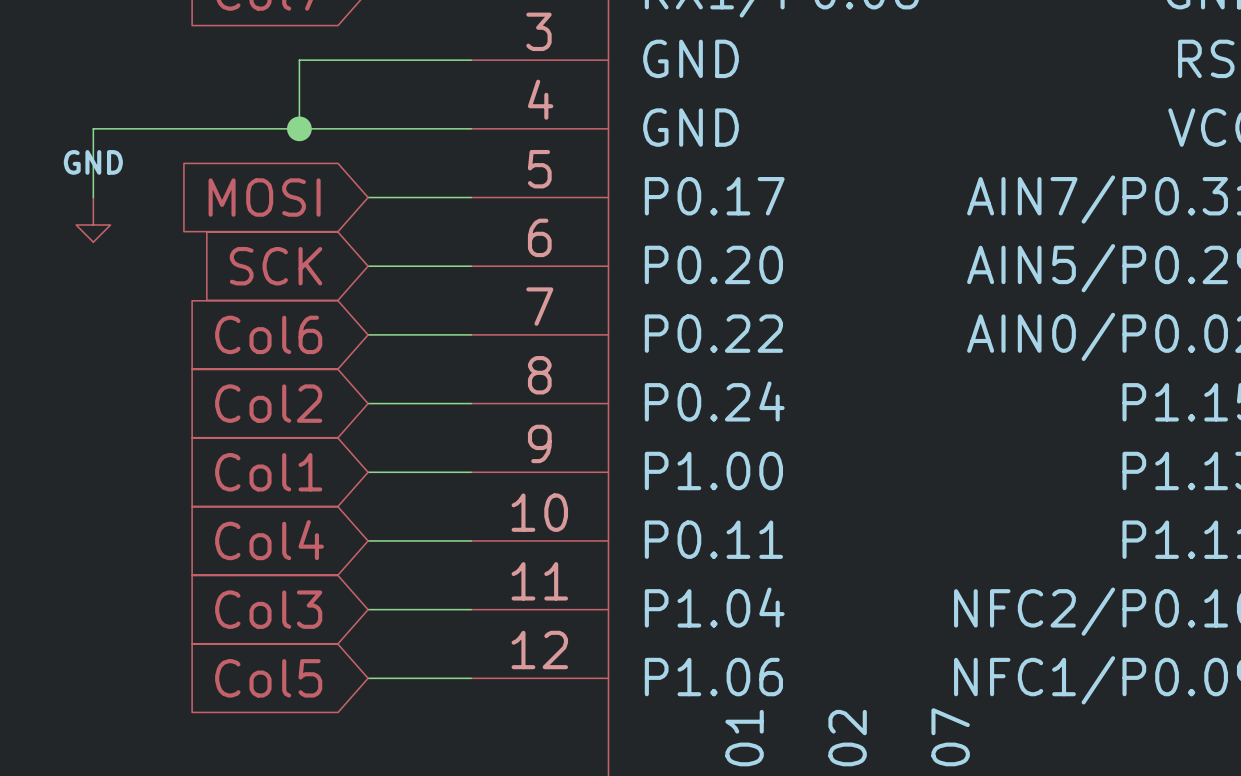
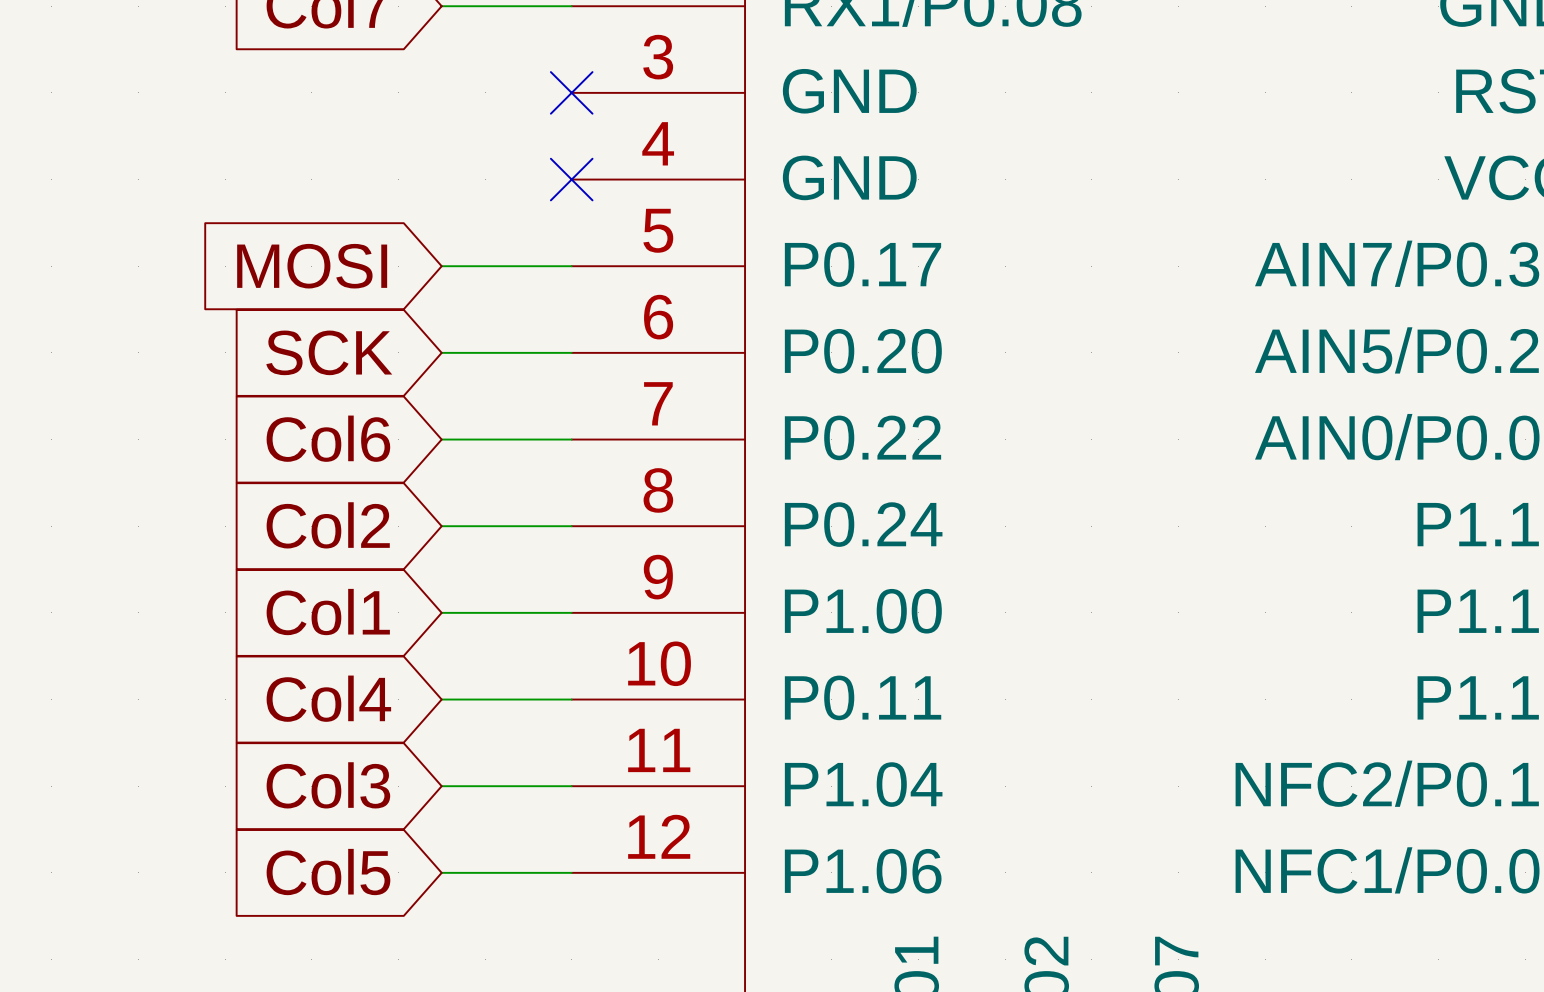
wire: (471, 60) (299, 60) (299, 128) -> none
no-connect mark: none -> (571, 92)
junction: (299, 128) -> none
wire: (471, 128) (93, 128) (93, 197) -> none
no-connect mark: none -> (571, 179)
power symbol: GND (93, 219) -> none

